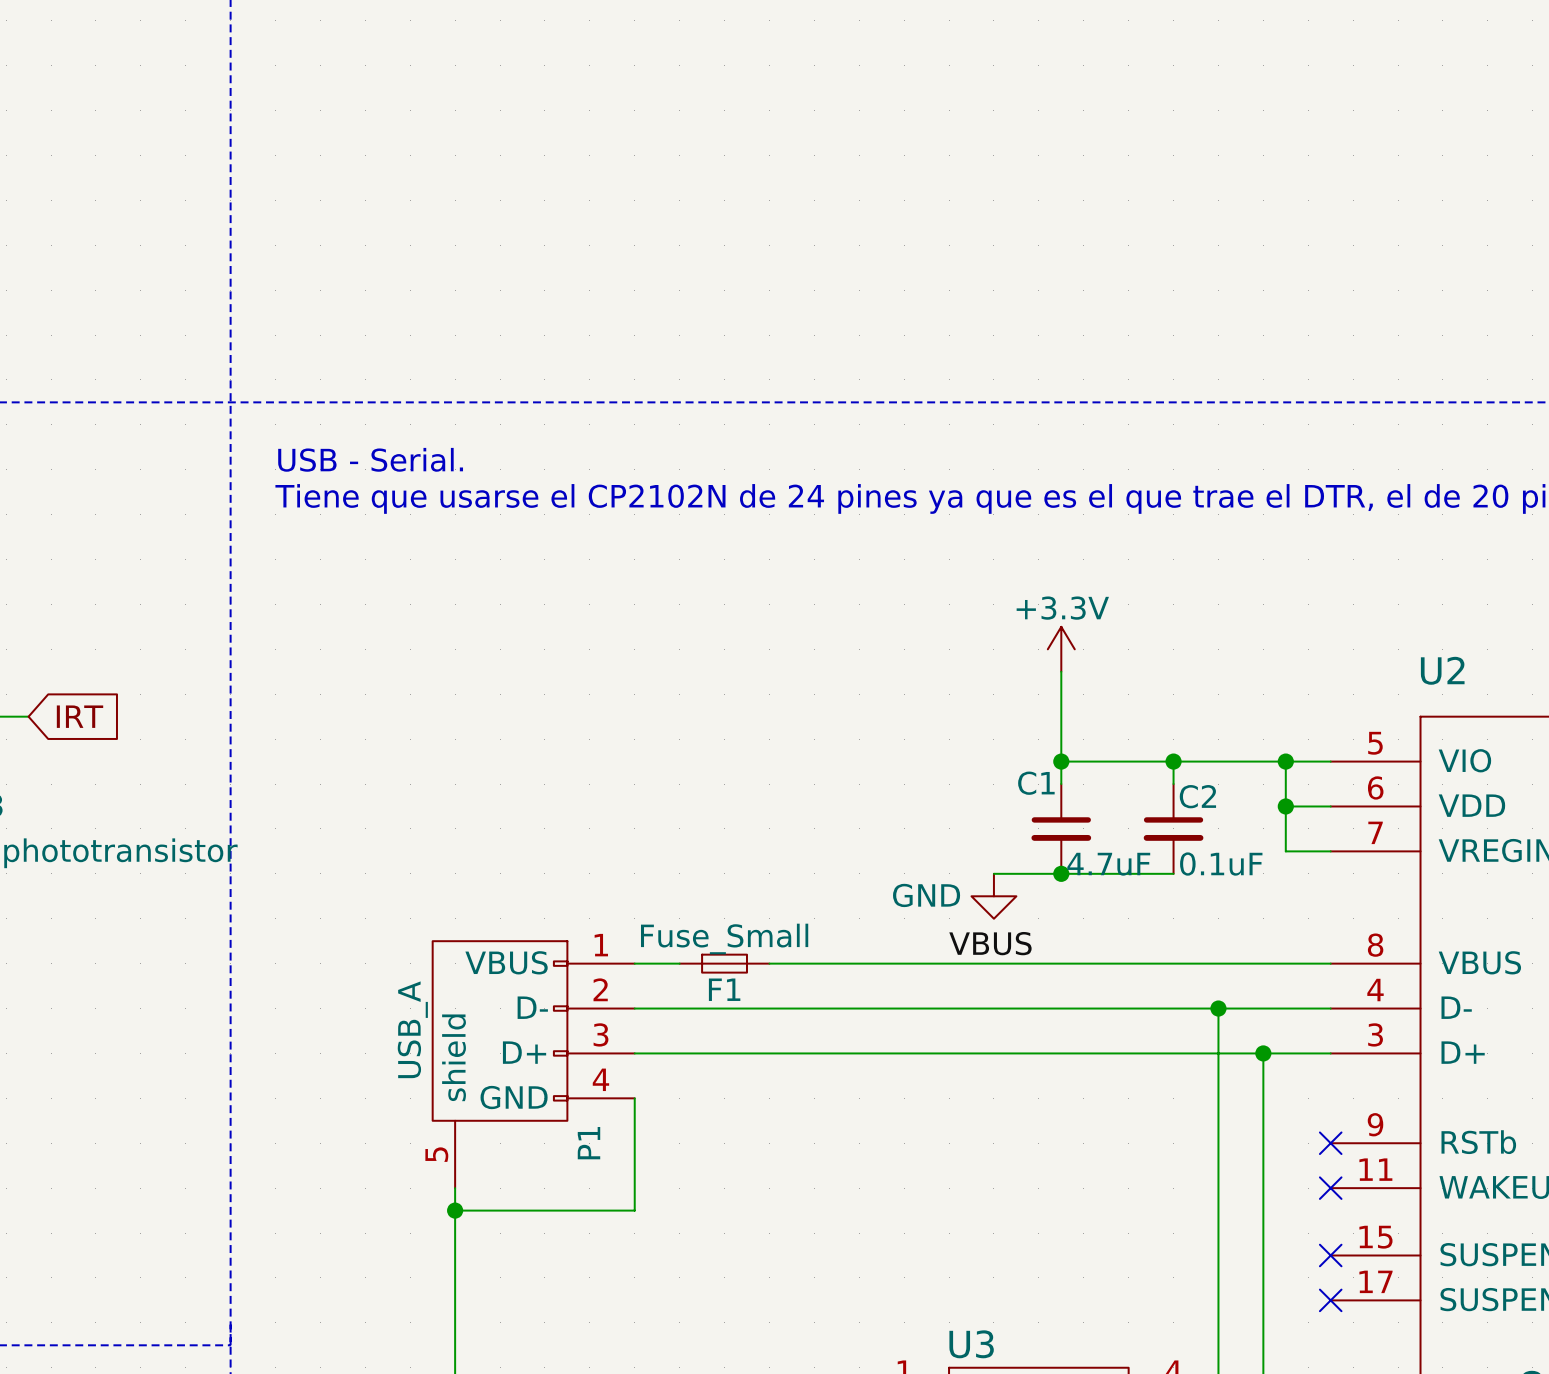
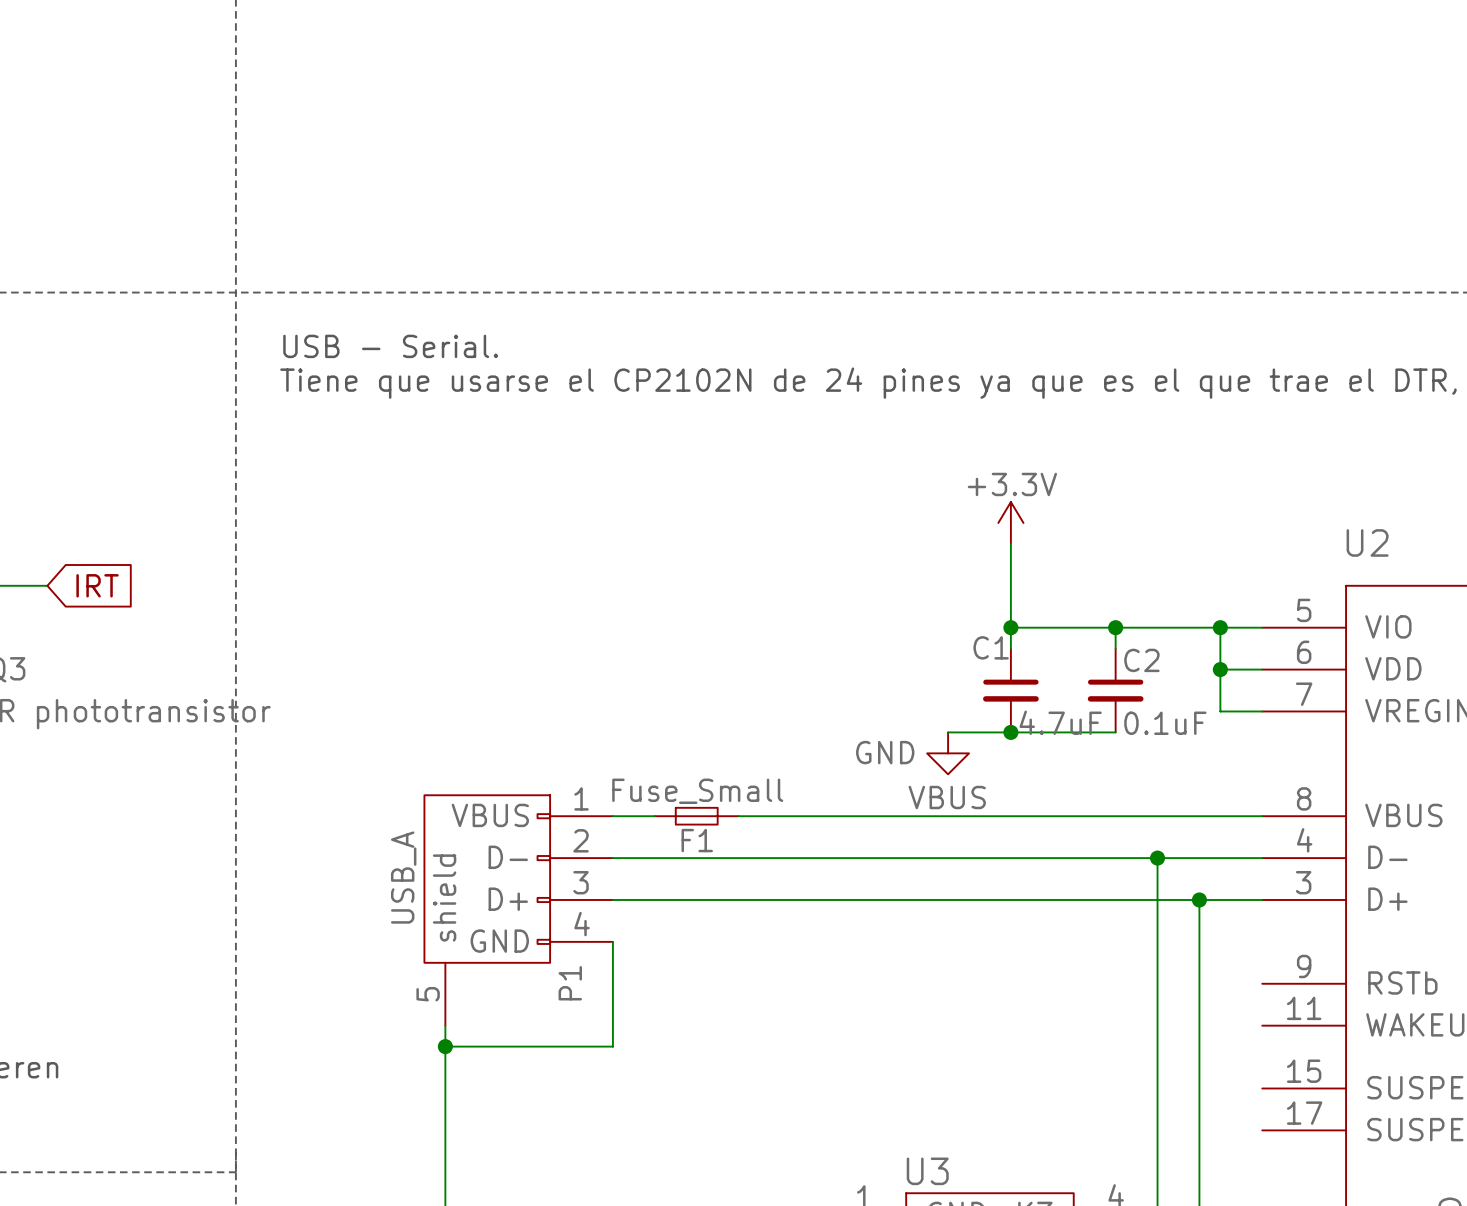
no-connect mark: (1330, 1143) -> none
no-connect mark: (1330, 1188) -> none
no-connect mark: (1330, 1255) -> none
no-connect mark: (1330, 1300) -> none

